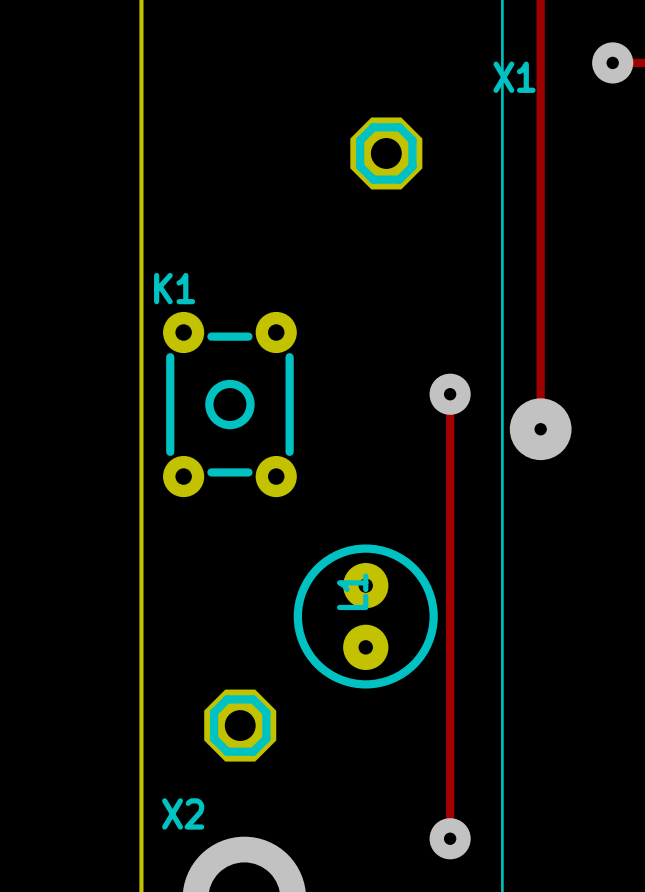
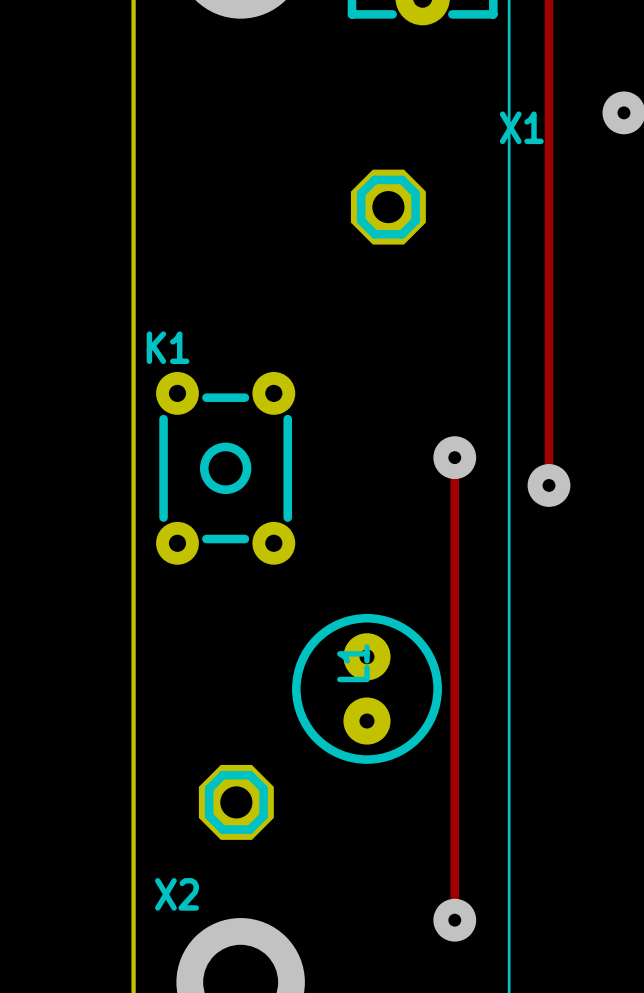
via size: [509, 398, 572, 461] -> [527, 464, 571, 507]

